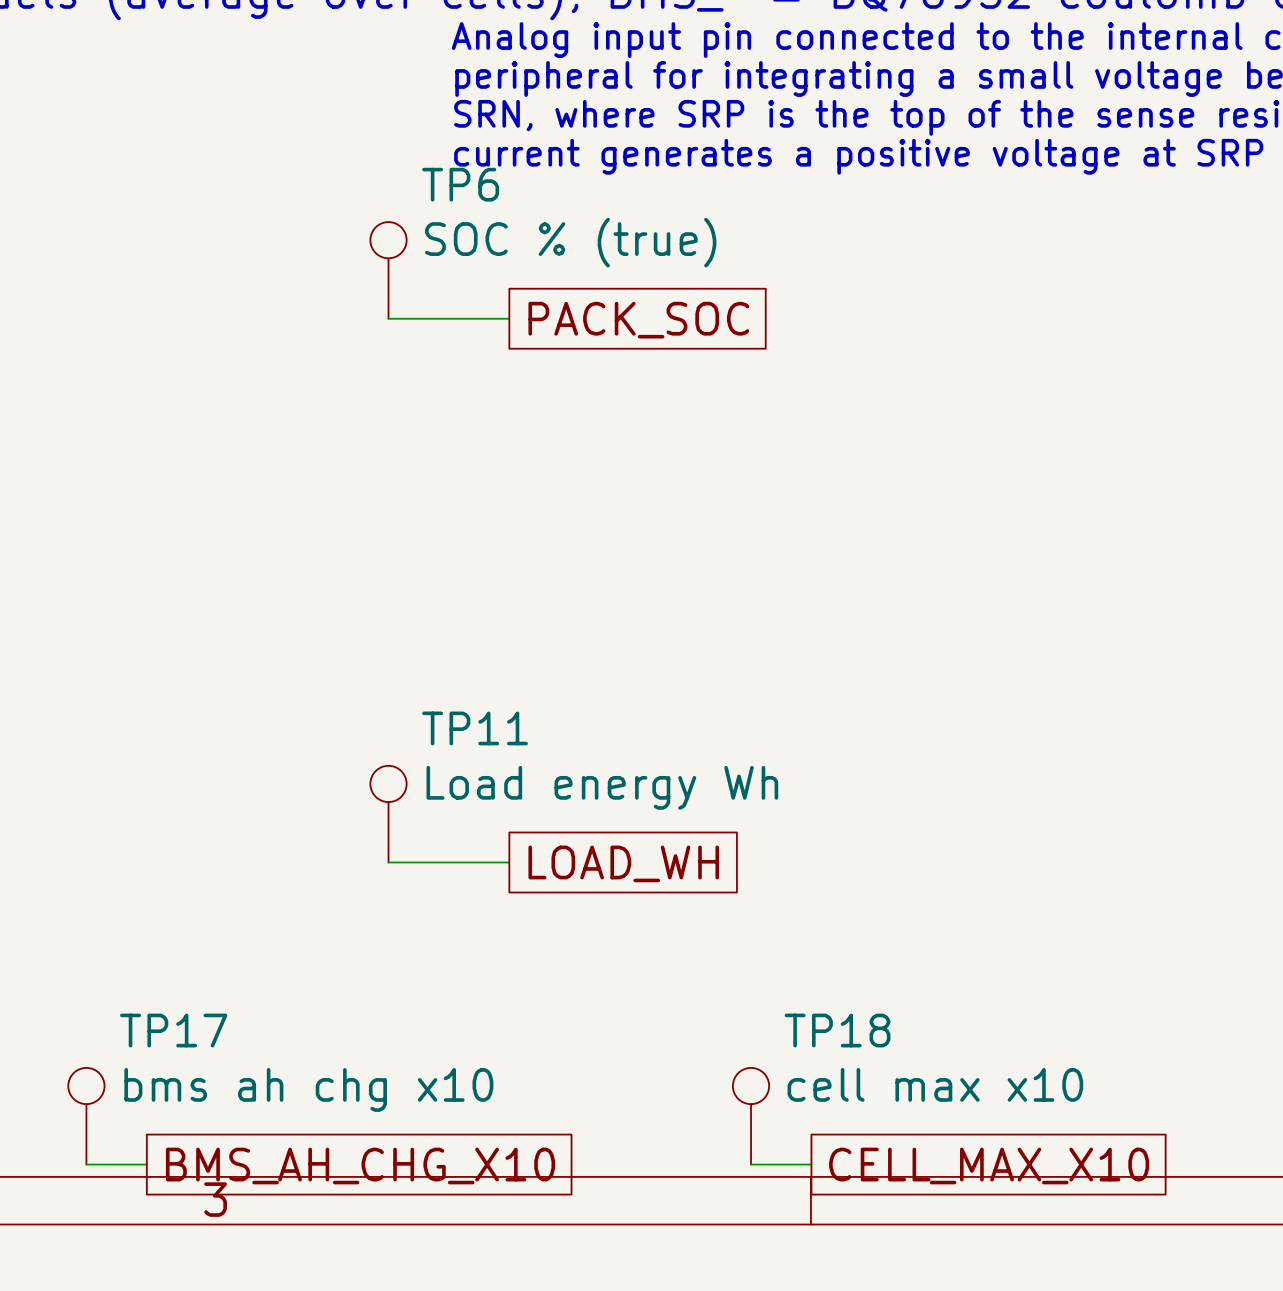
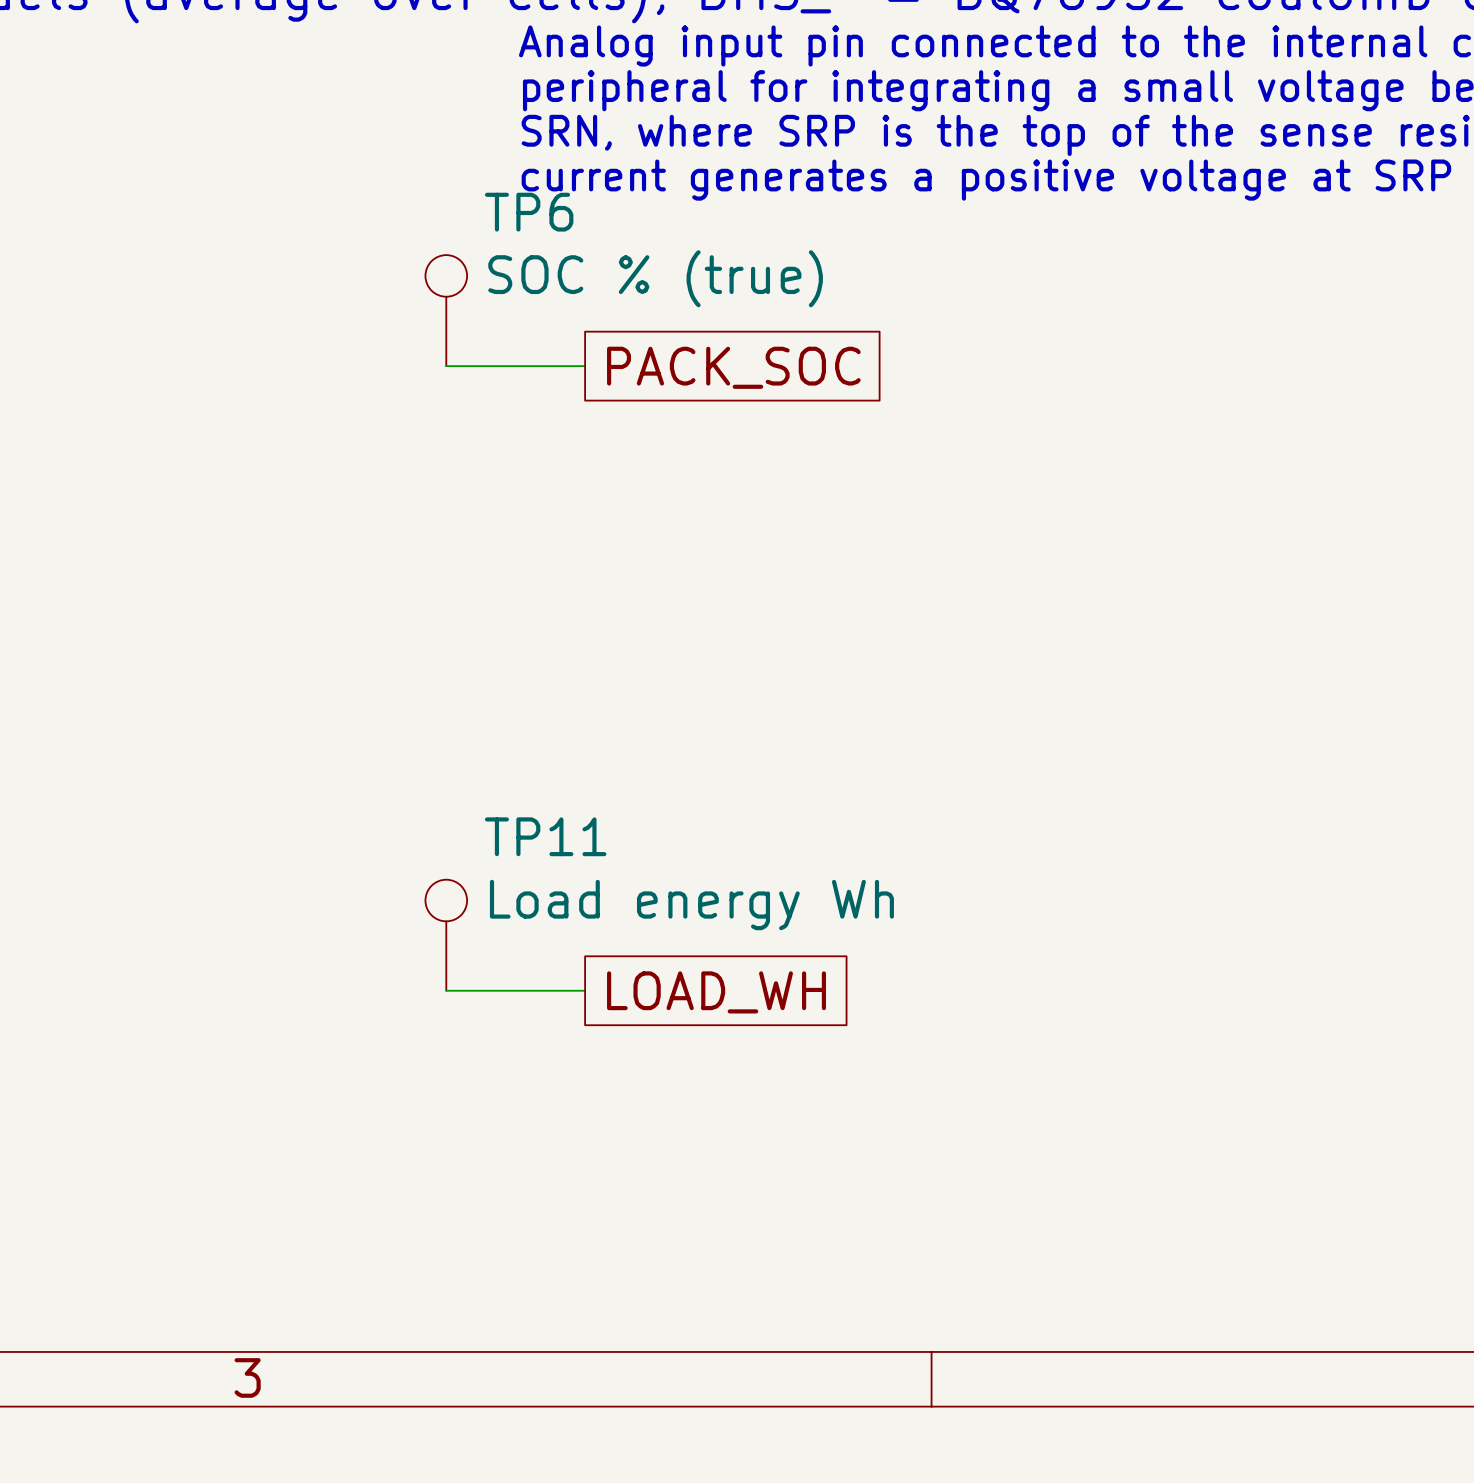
TP17: bms ah chg x10 (86, 1116) -> none
TP18: cell max x10 (751, 1116) -> none
wire: (86, 1164) (146, 1164) -> none
wire: (751, 1164) (811, 1164) -> none
global label: BMS_AH_CHG_X10 (360, 1166) -> none
global label: CELL_MAX_X10 (989, 1166) -> none

